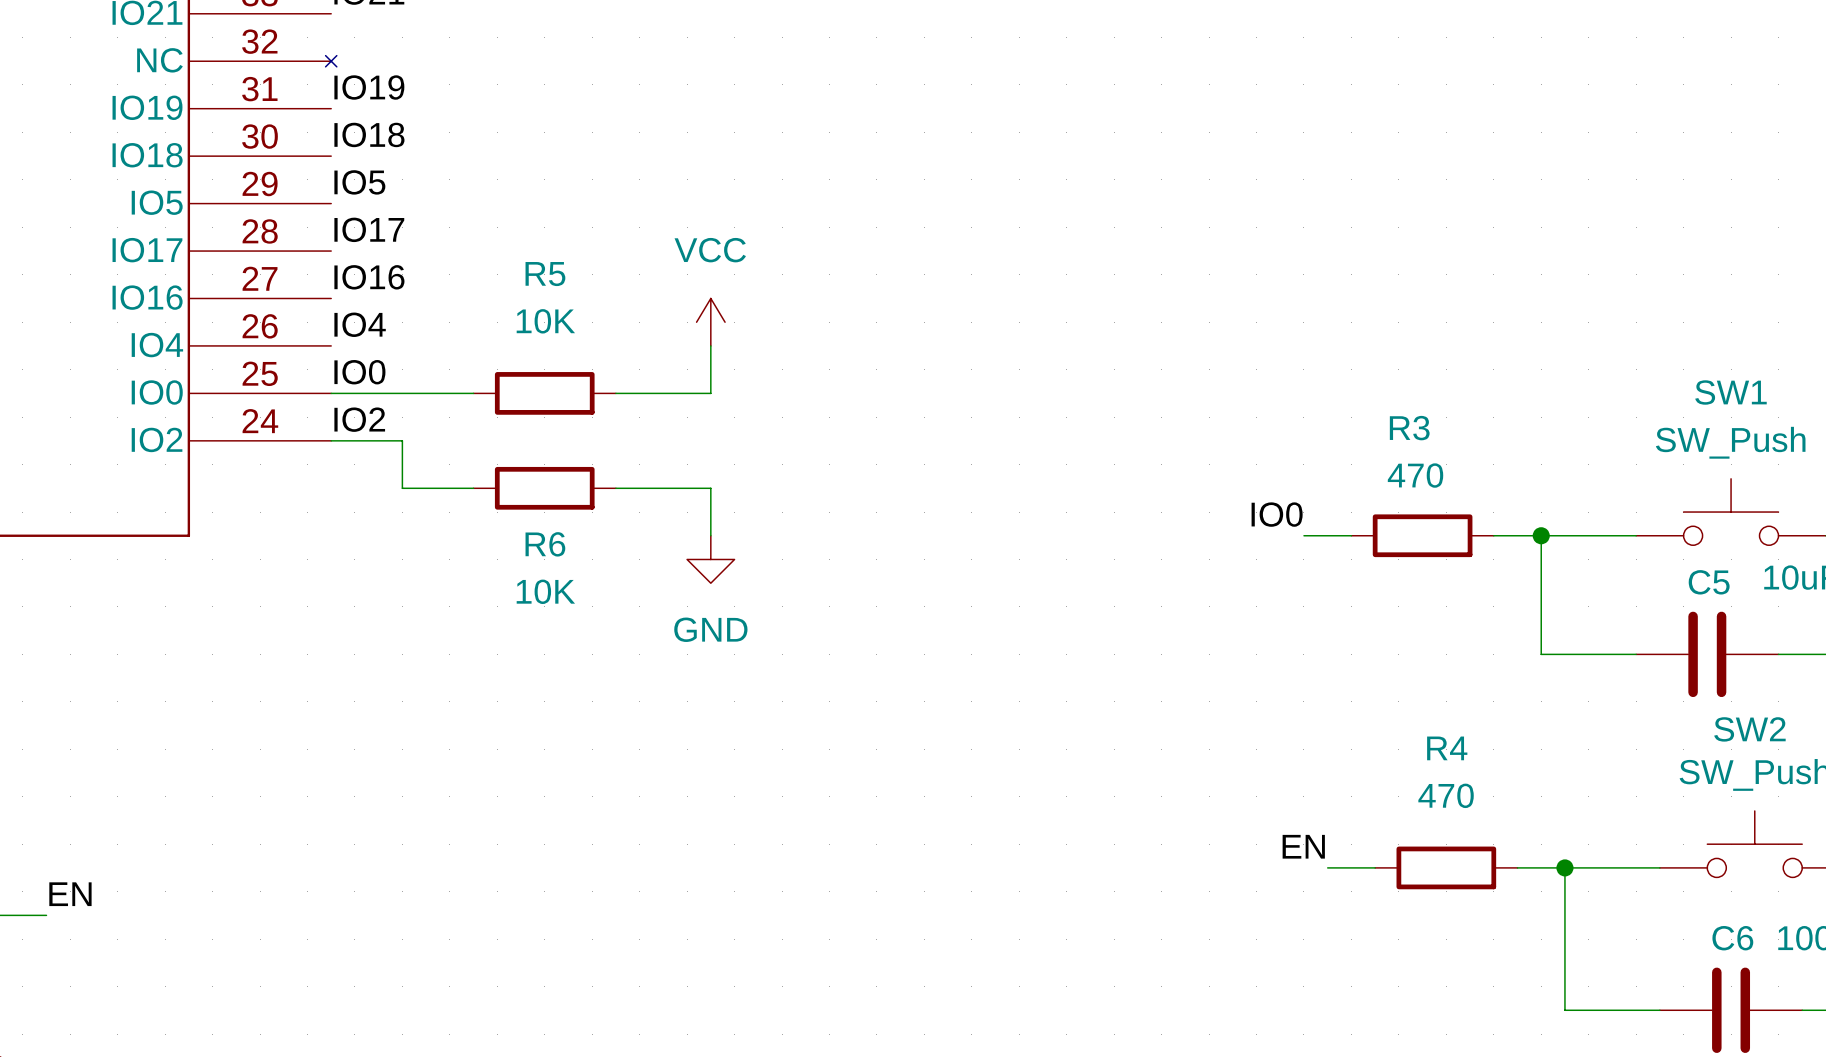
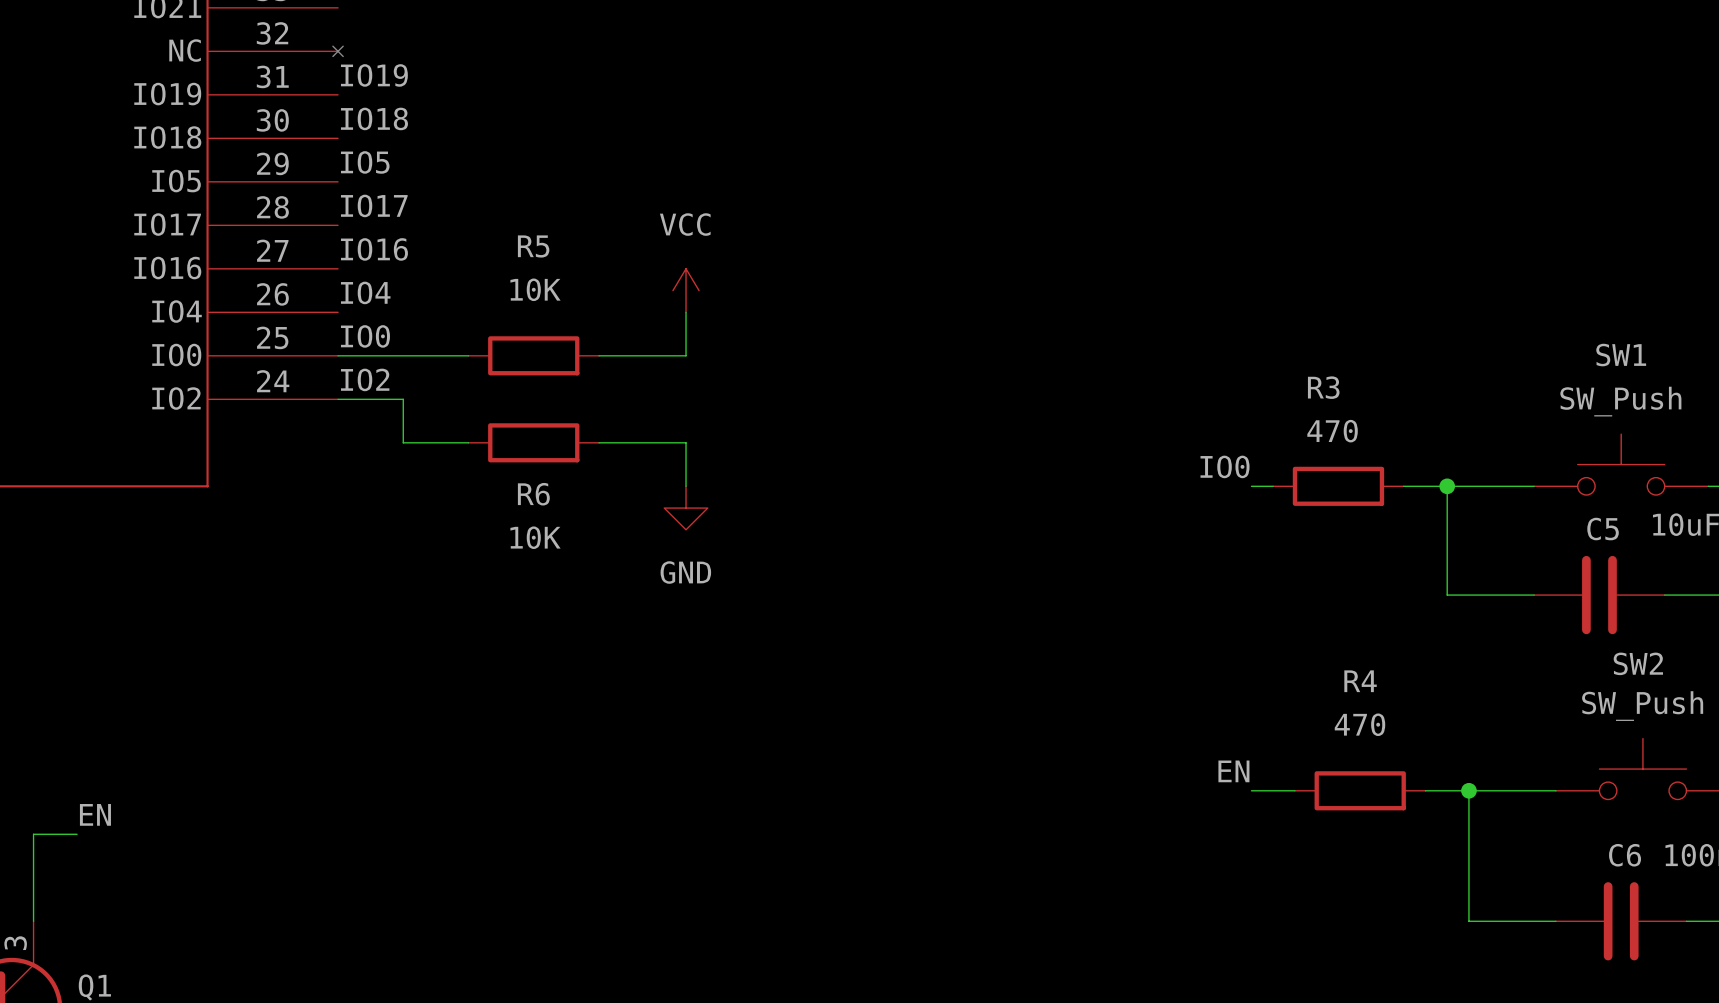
label position: IO0 (1277, 514) -> IO0 (1225, 466)
wire: (1303, 535) (1327, 535) -> none

